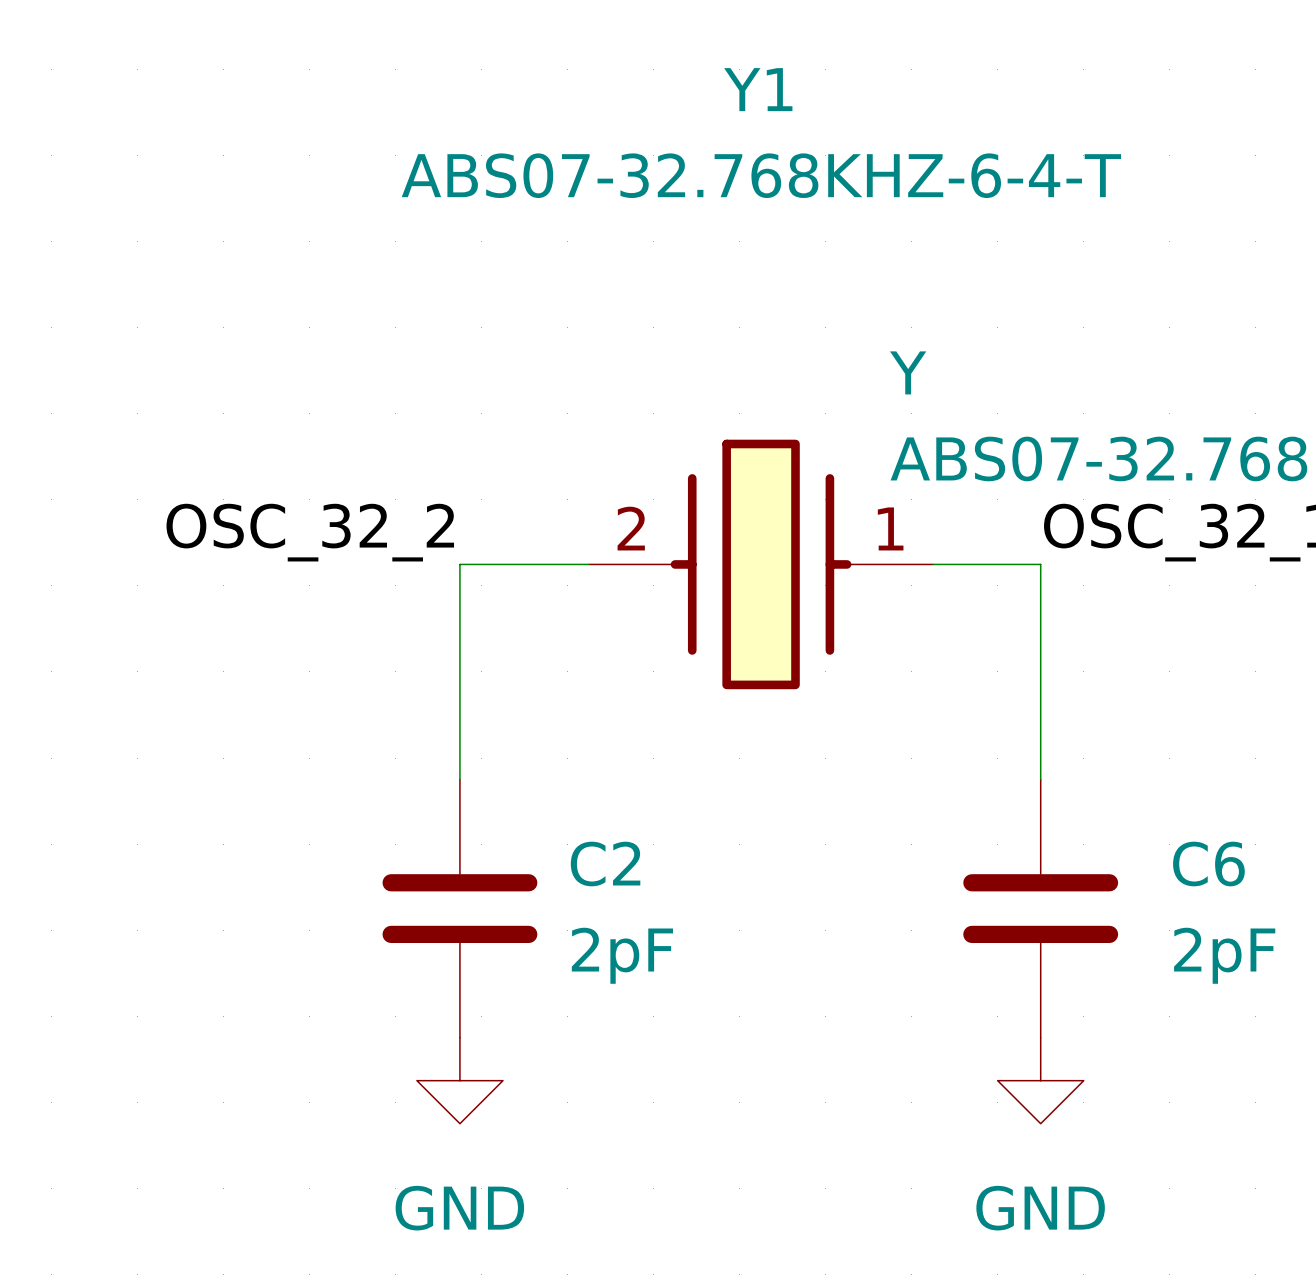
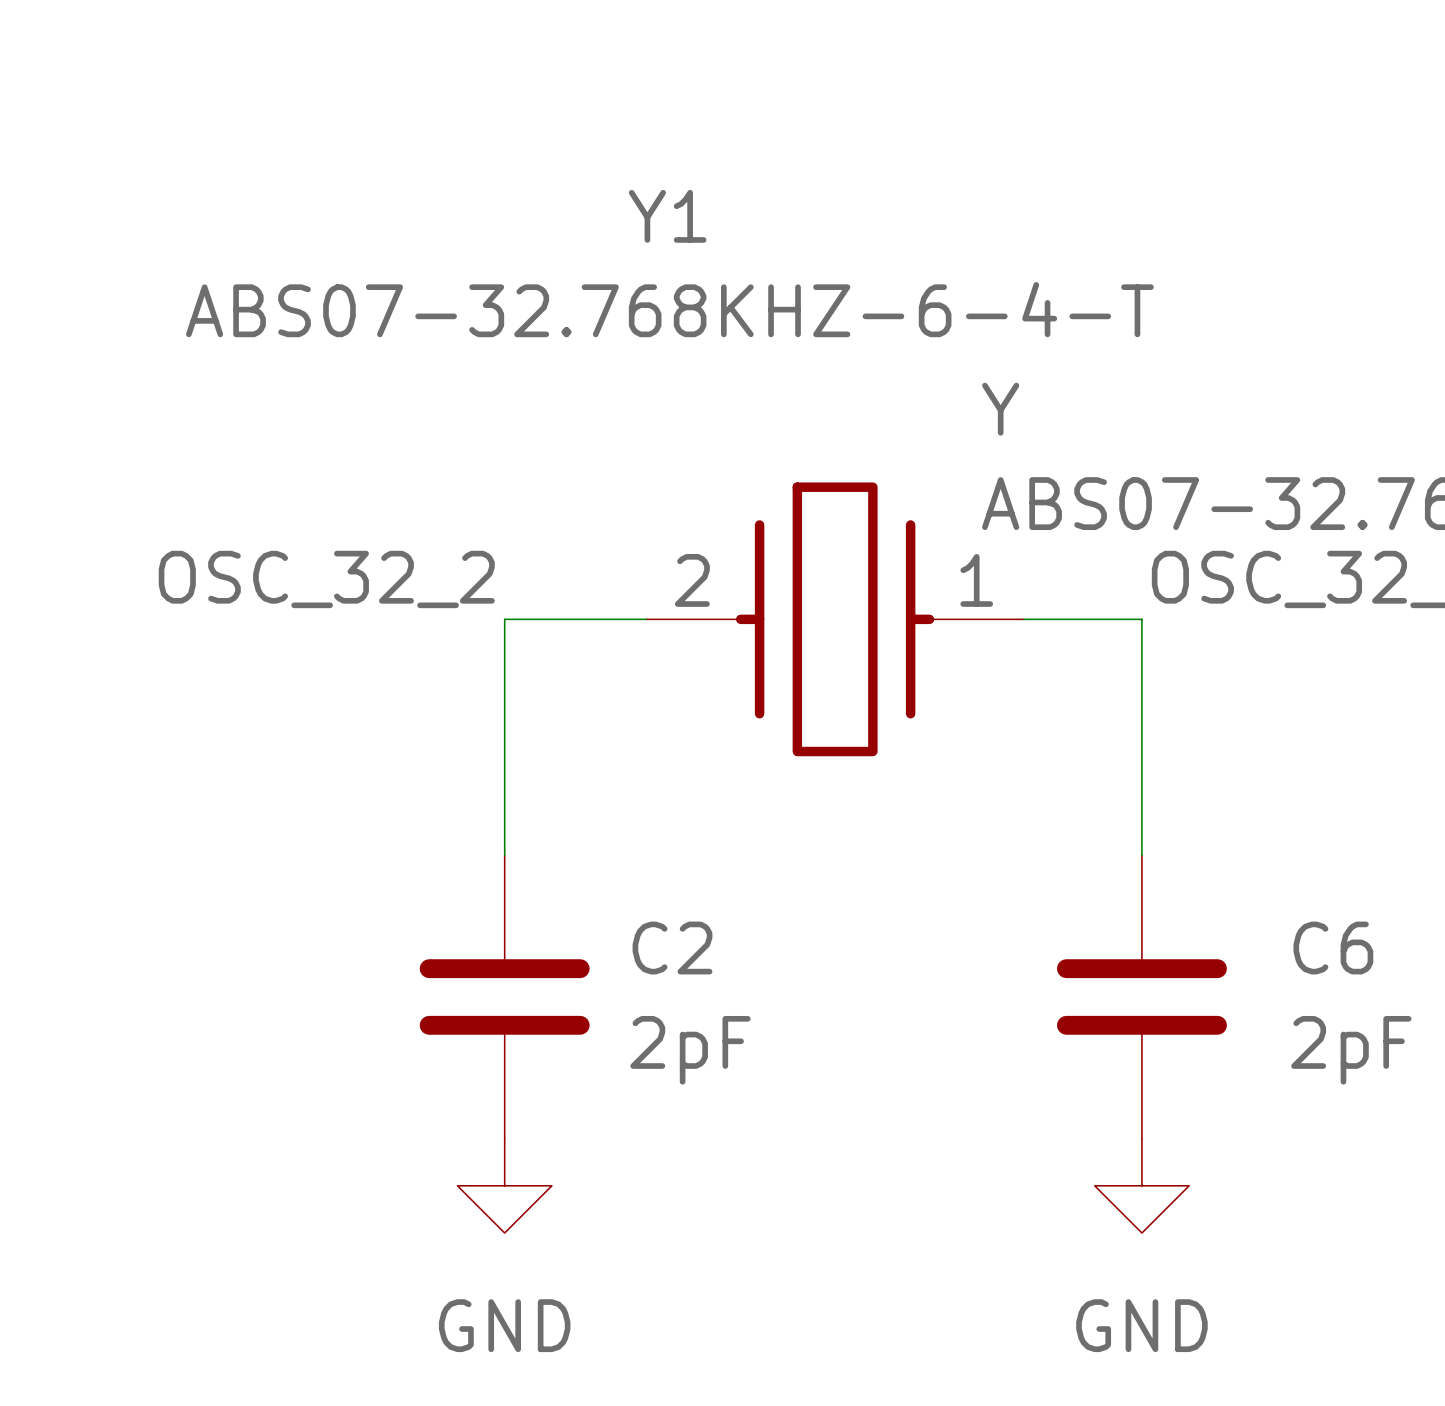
Y1 name position: Y1 (758, 89) -> Y1 (667, 216)
Y1 value position: ABS07-32.768KHZ-6-4-T (761, 175) -> ABS07-32.768KHZ-6-4-T (669, 309)

